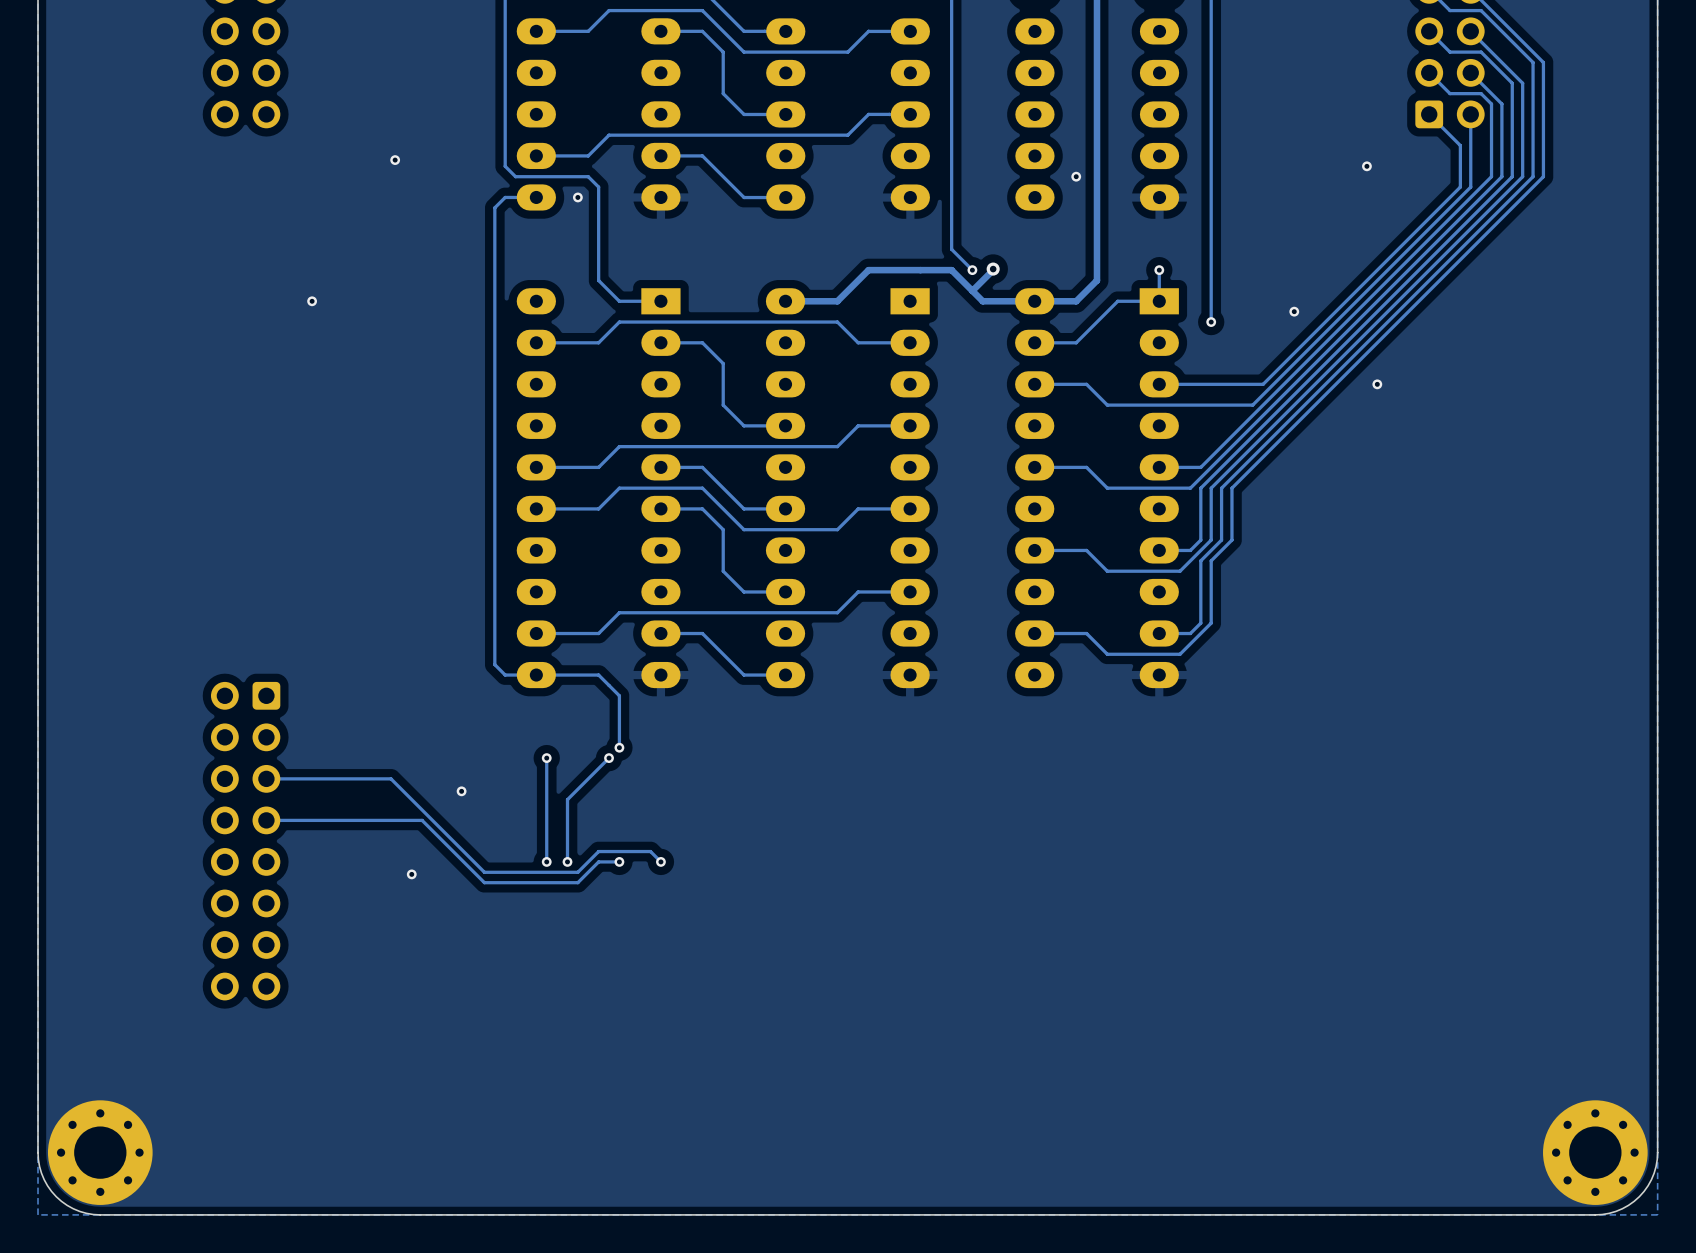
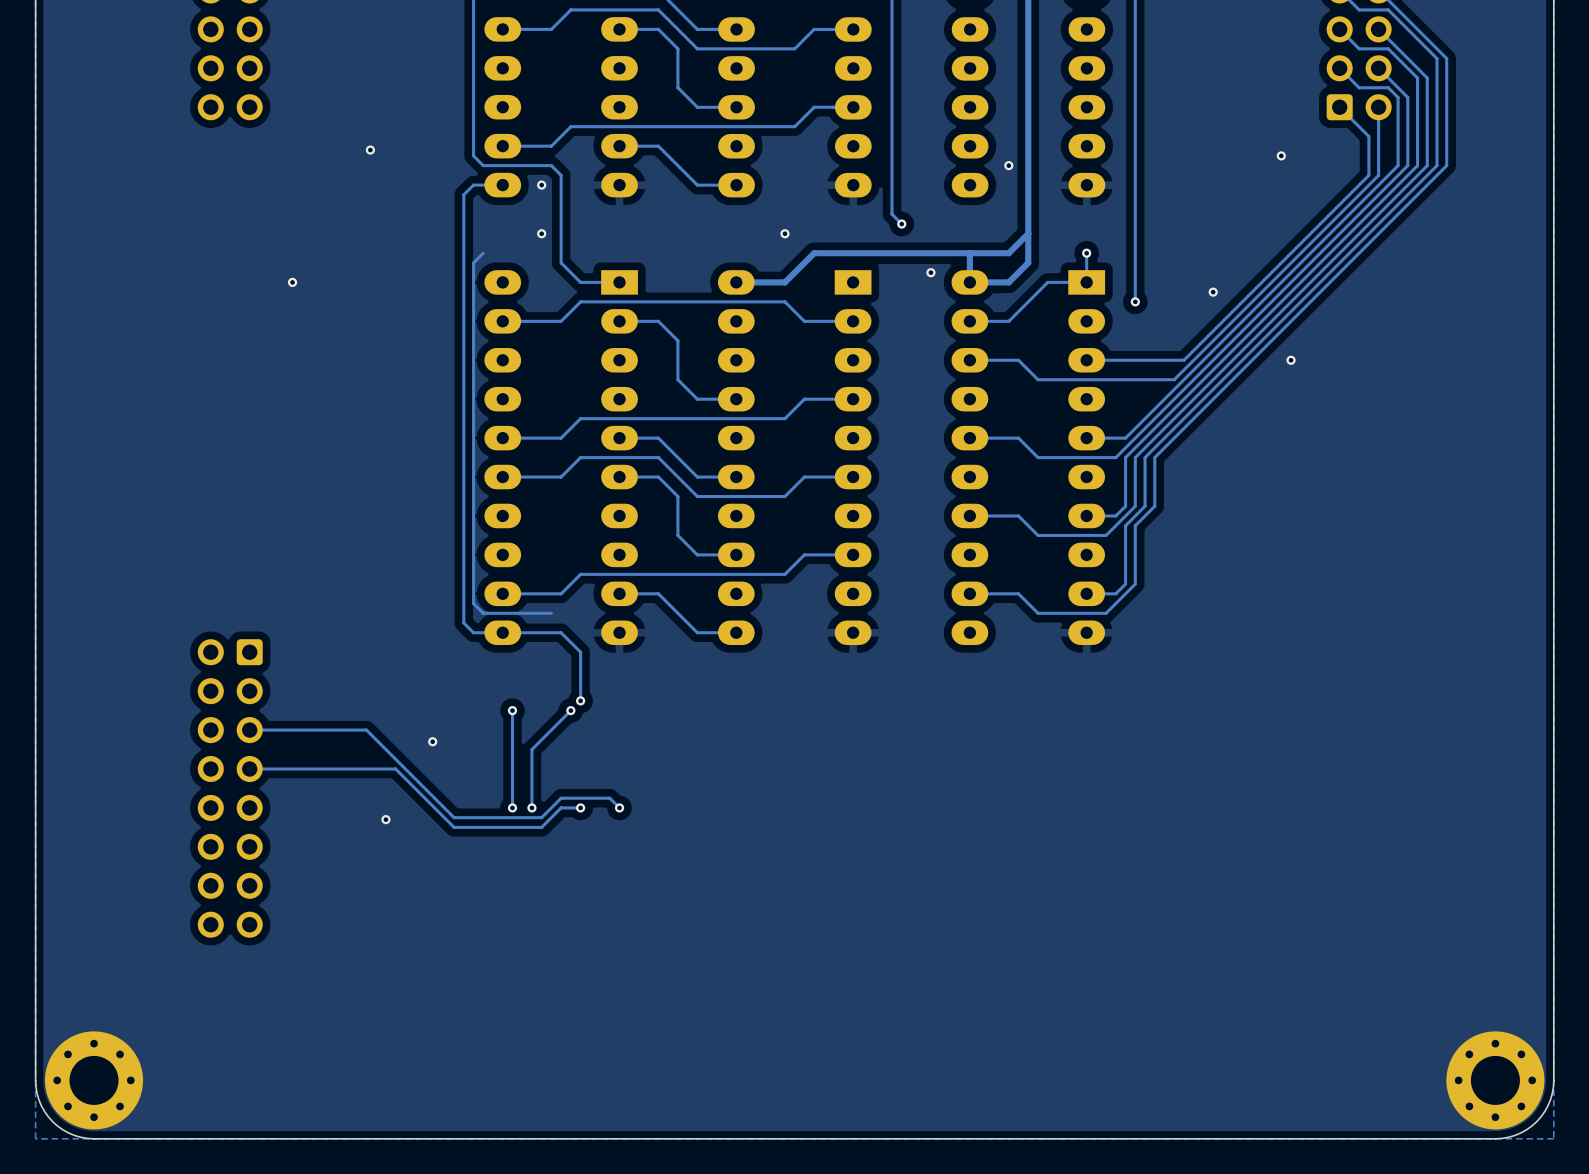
track: (951, 228) (951, 249) (972, 270) -> (892, 214) (901, 224)
via: none -> (901, 224)
via: none -> (541, 233)
via: none -> (784, 233)
track: (993, 269) (972, 290) -> none
via: (993, 269) -> none
track: none -> (483, 253) (473, 262) (473, 603) (483, 613) (551, 613)
track: (951, 270) (982, 301) (1034, 301) -> (892, 253) (1008, 253) (1028, 233)
via: (972, 270) -> none
track: none -> (969, 253) (969, 282)
via: none -> (930, 272)

